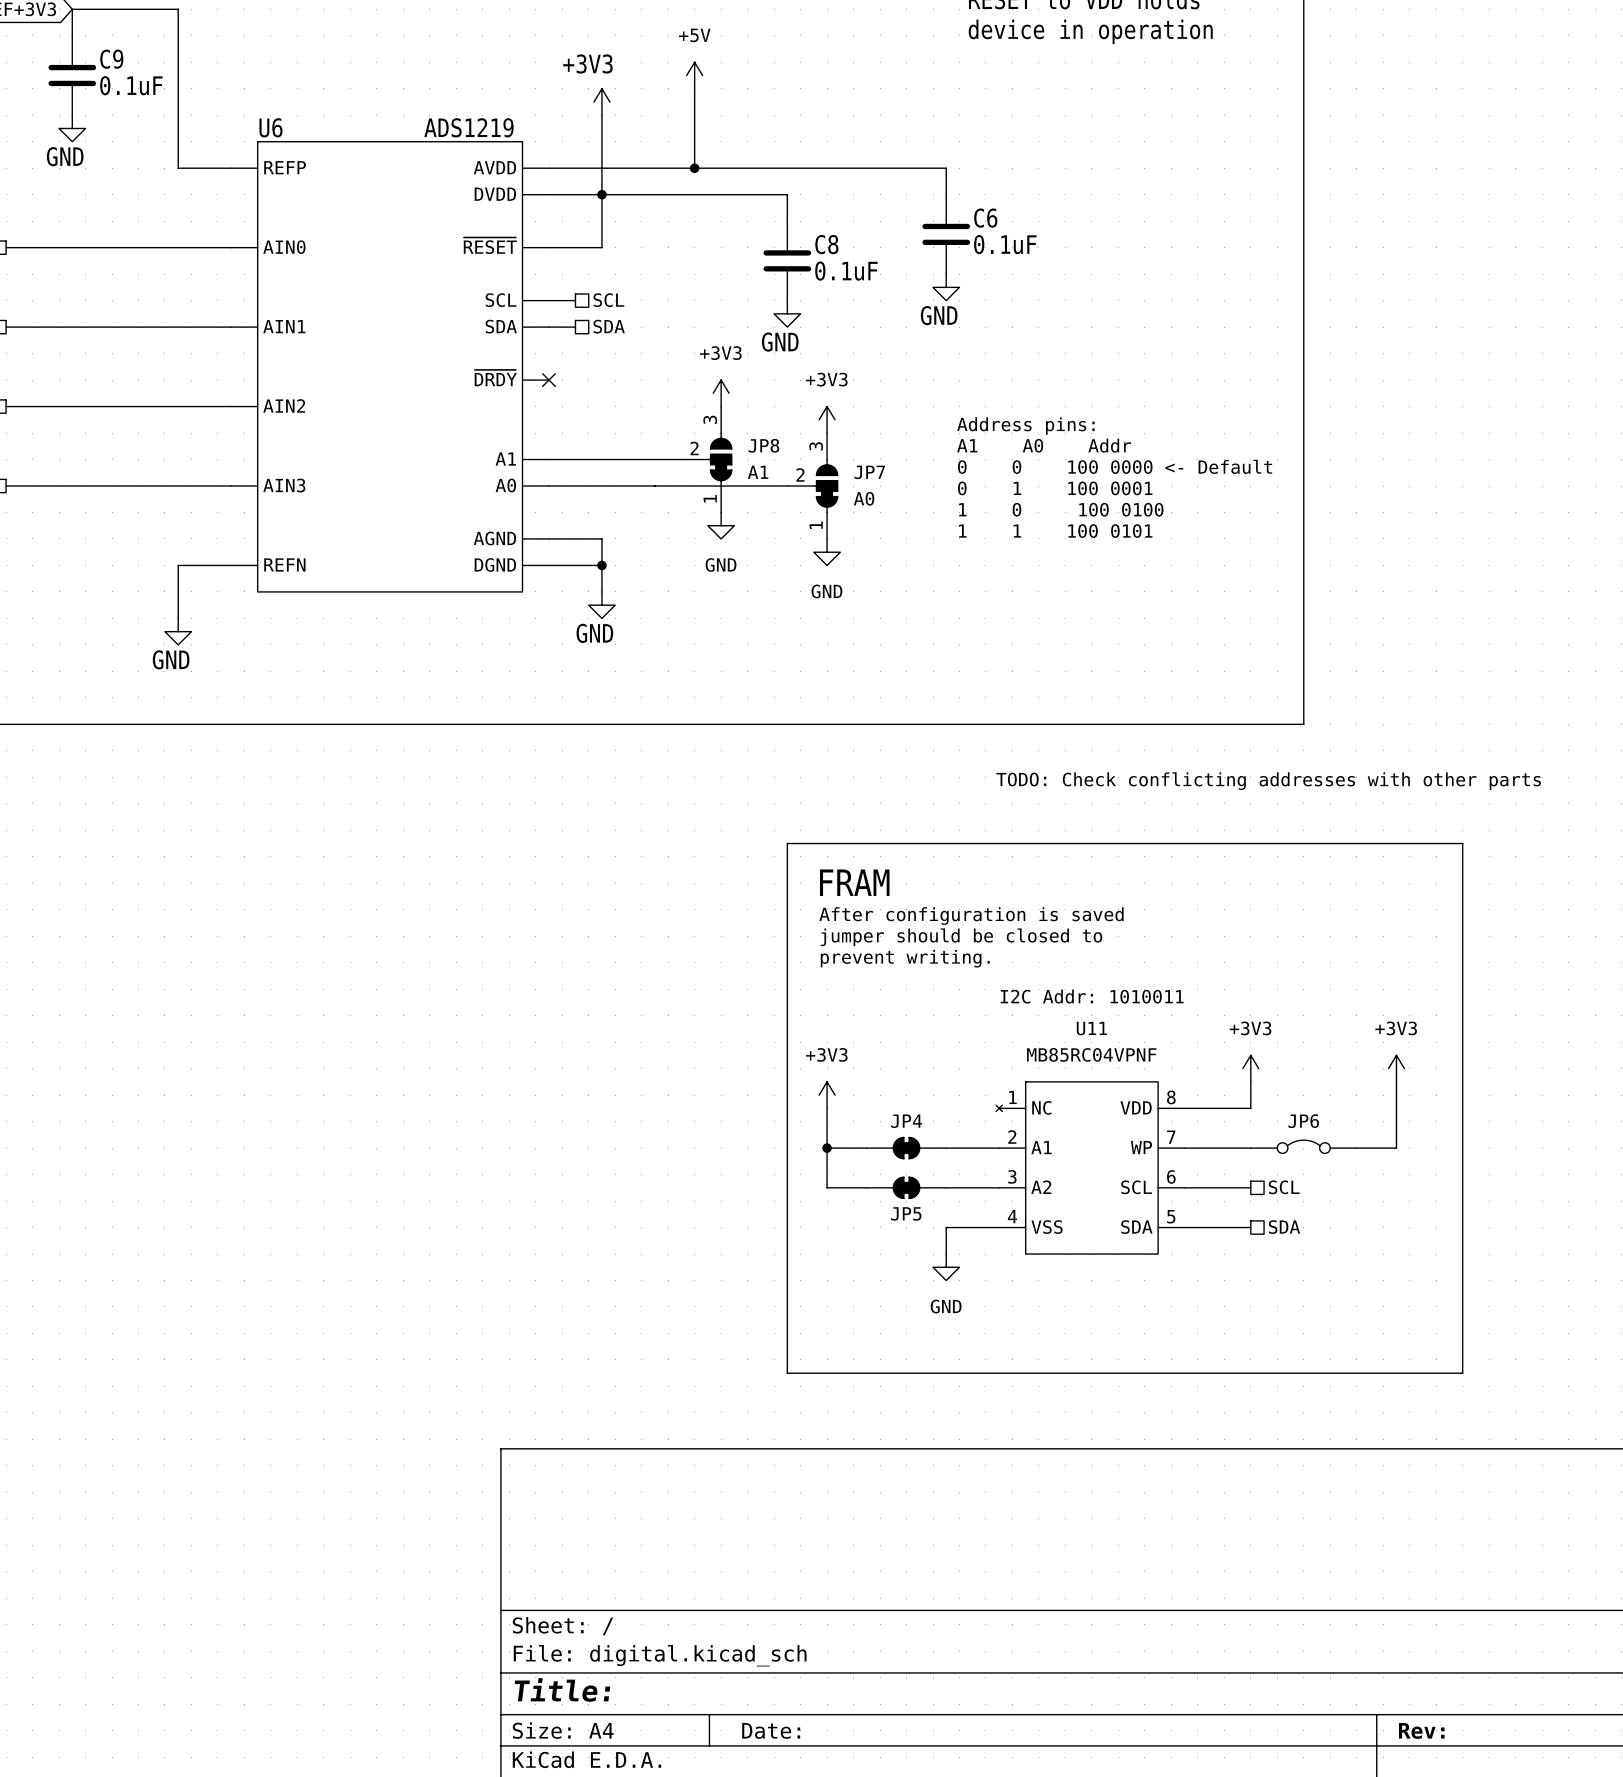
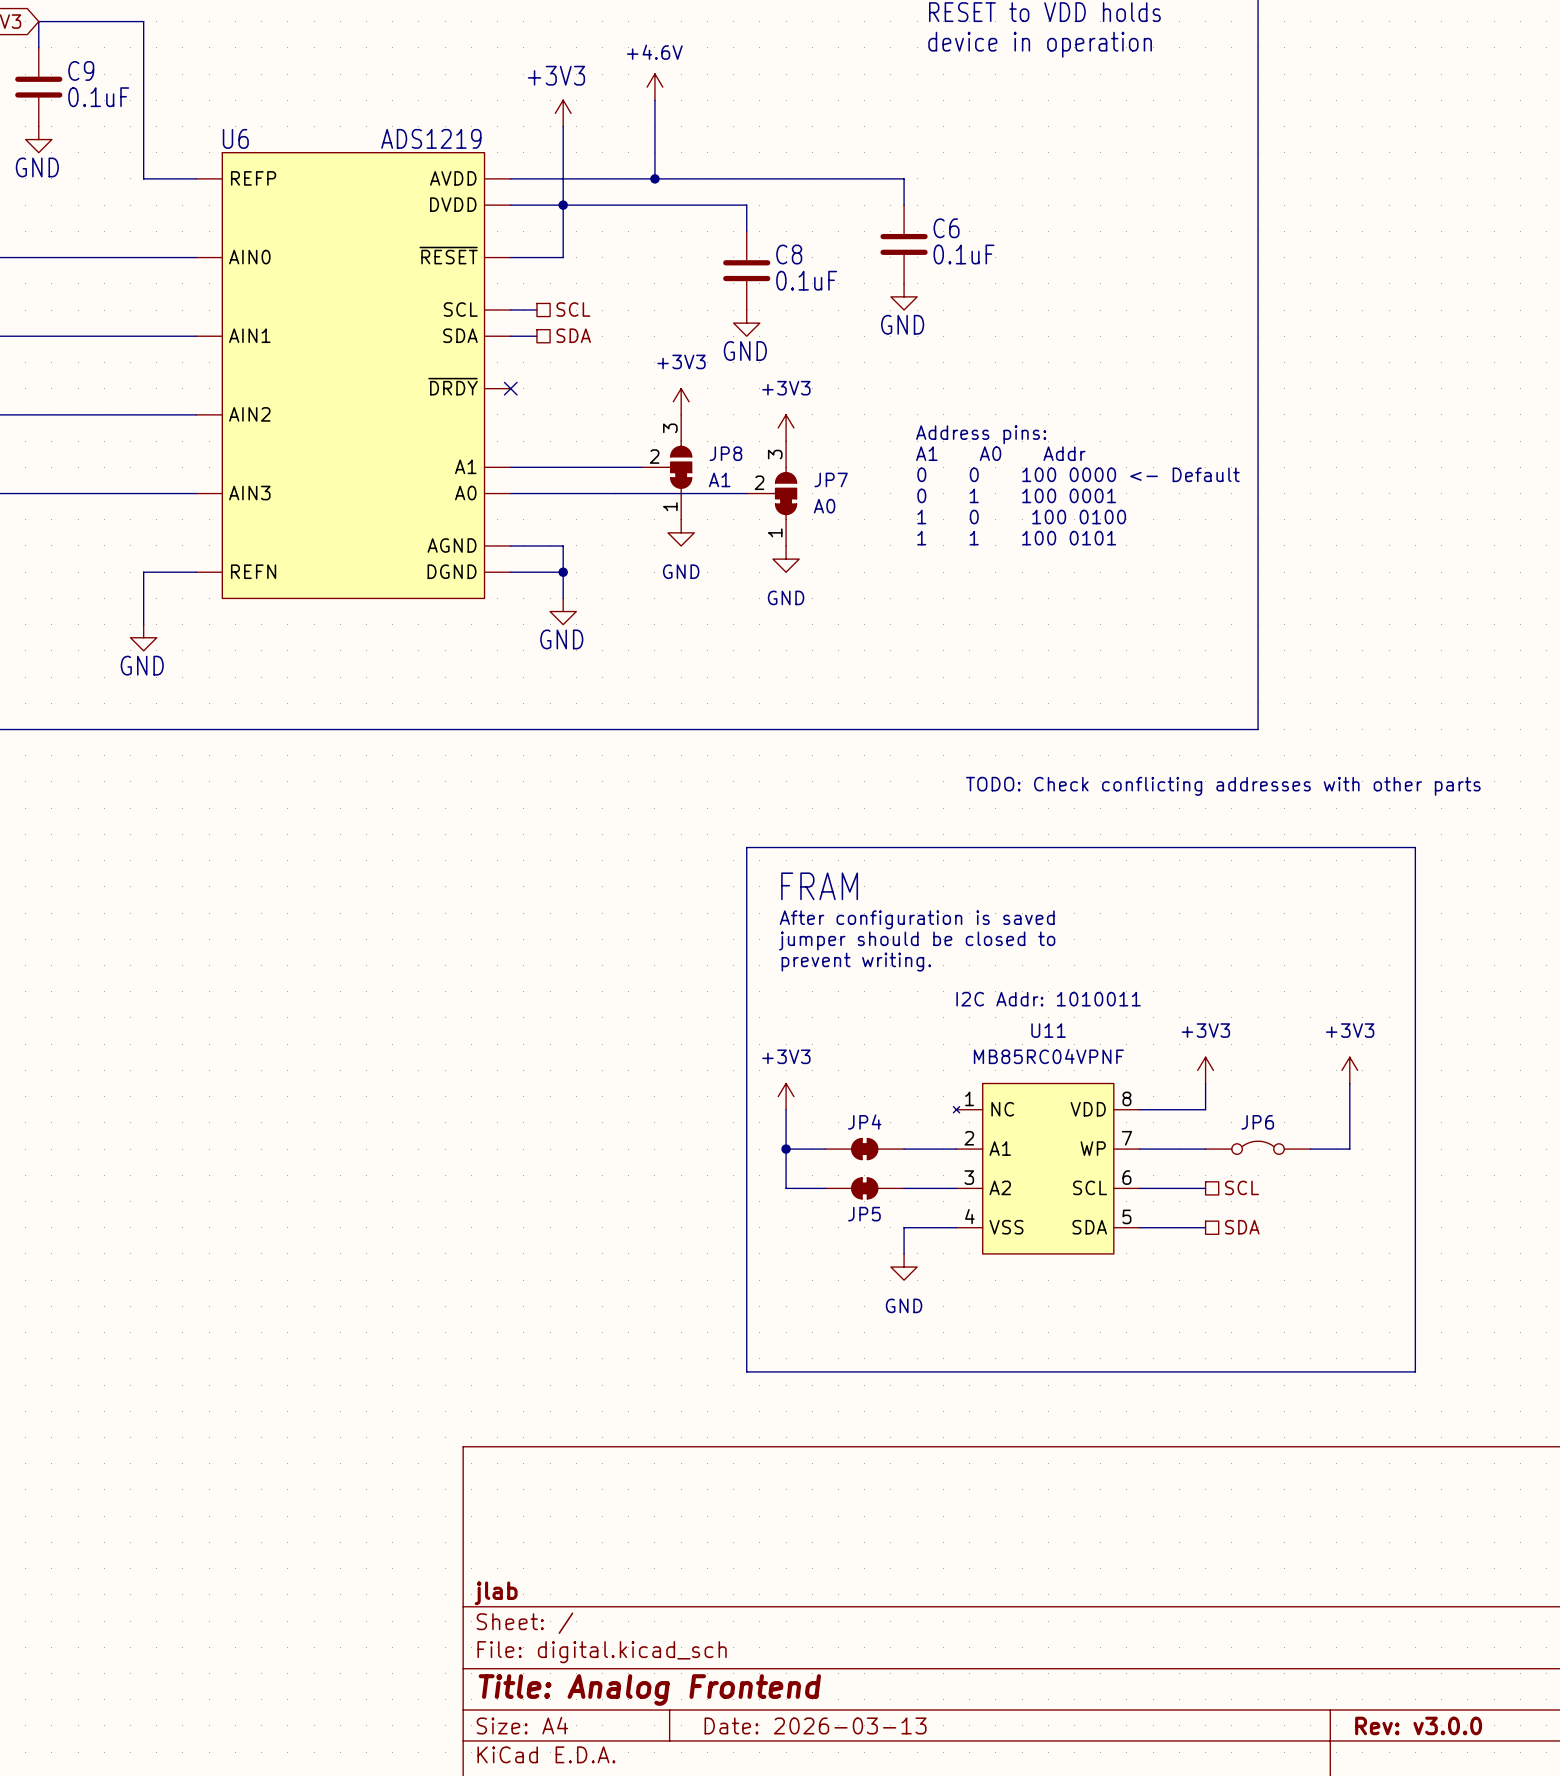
power symbol: +5V (694, 75) -> +4.6V (654, 87)
title block: none -> jlab (496, 1593)
title block: Title: (562, 1689) -> Title: Analog Frontend (649, 1689)
title block: Date: (771, 1730) -> Date: 2026-03-13 (815, 1725)
title block: Rev: (1421, 1730) -> Rev: v3.0.0 (1418, 1725)

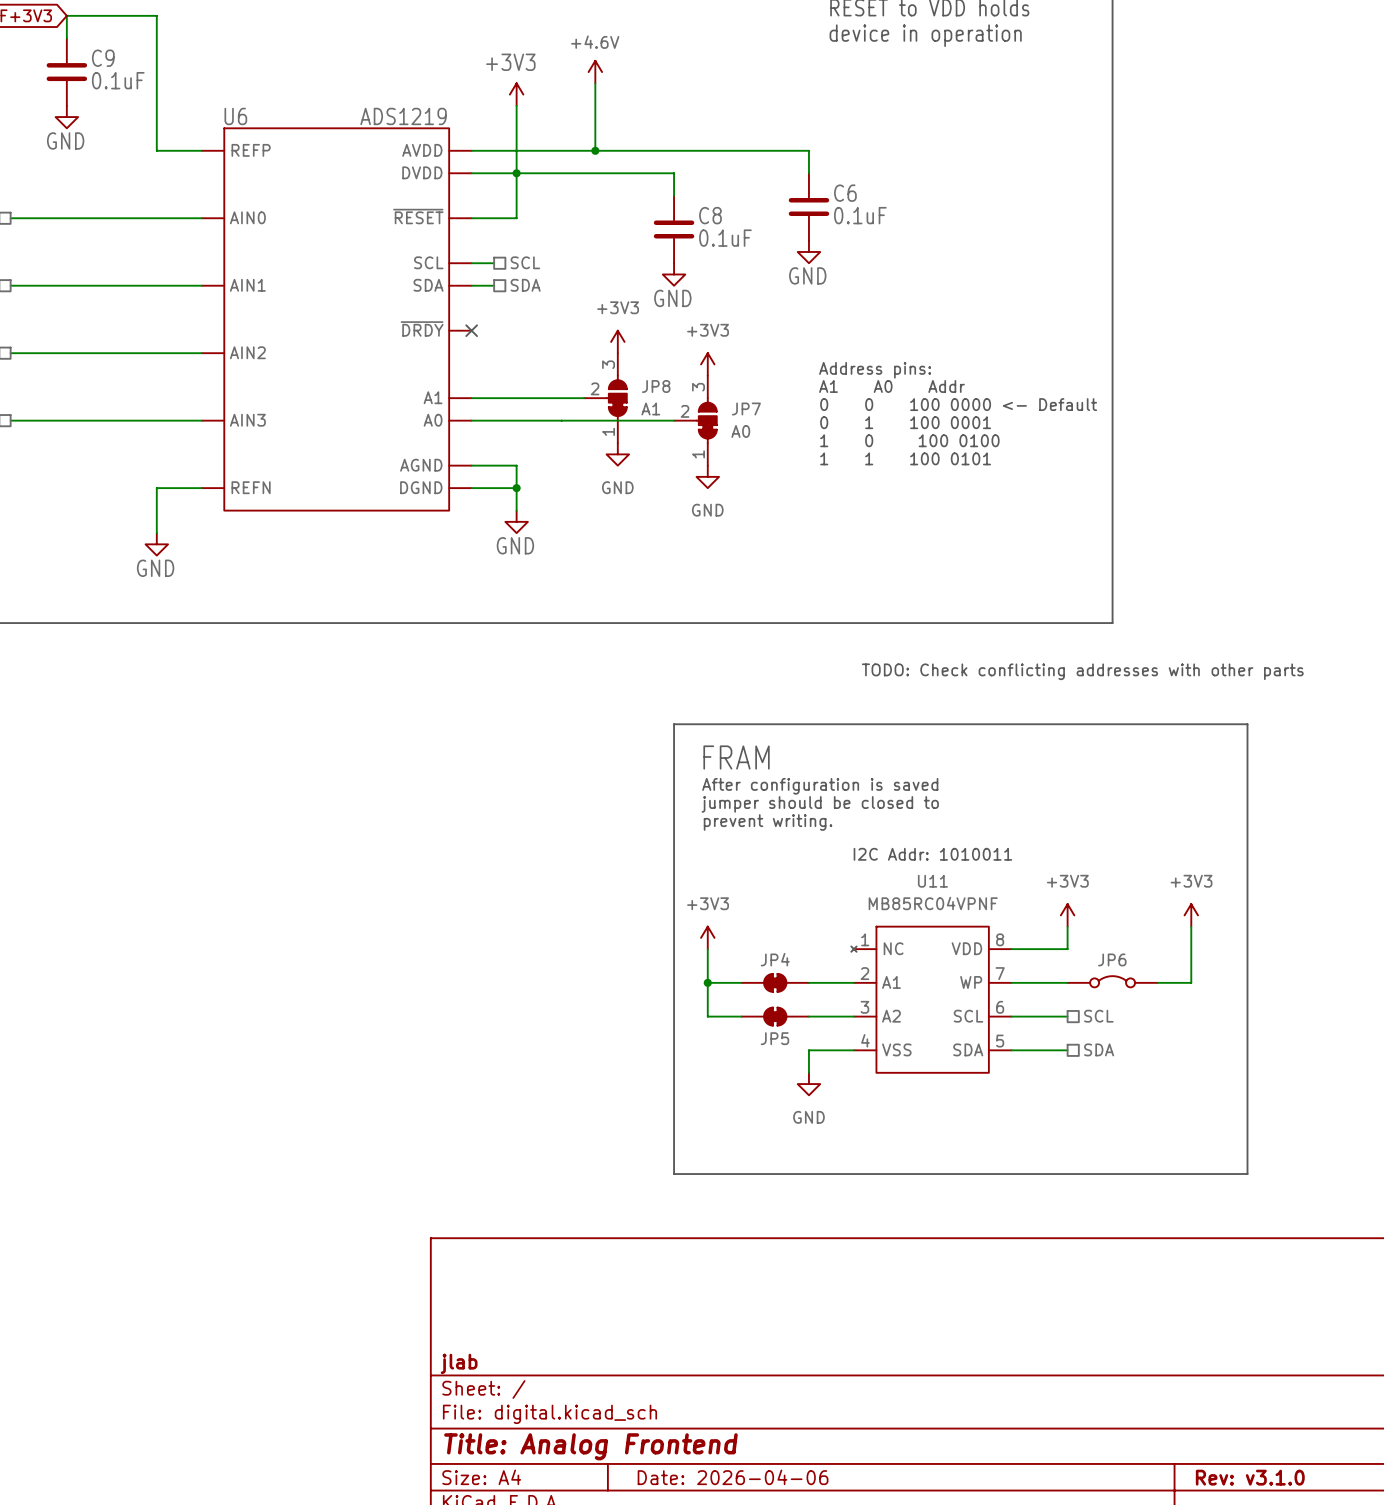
title block: Date: 2026-03-13 (815, 1725) -> Date: 2026-04-06 (733, 1477)
title block: Rev: v3.0.0 (1418, 1725) -> Rev: v3.1.0 (1250, 1477)

